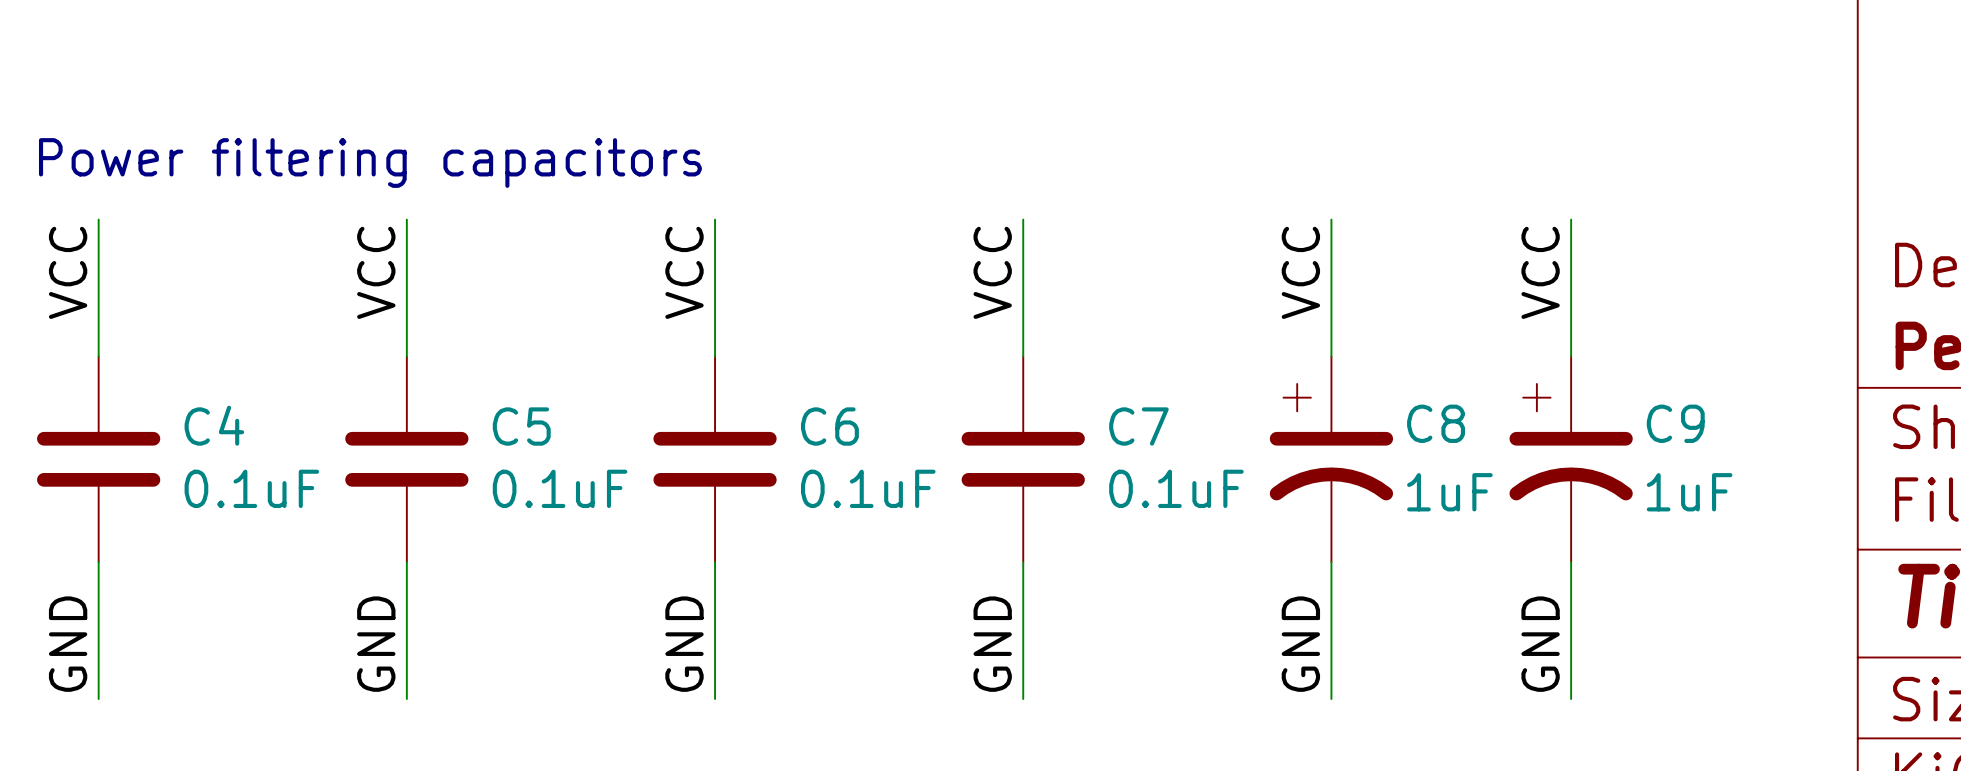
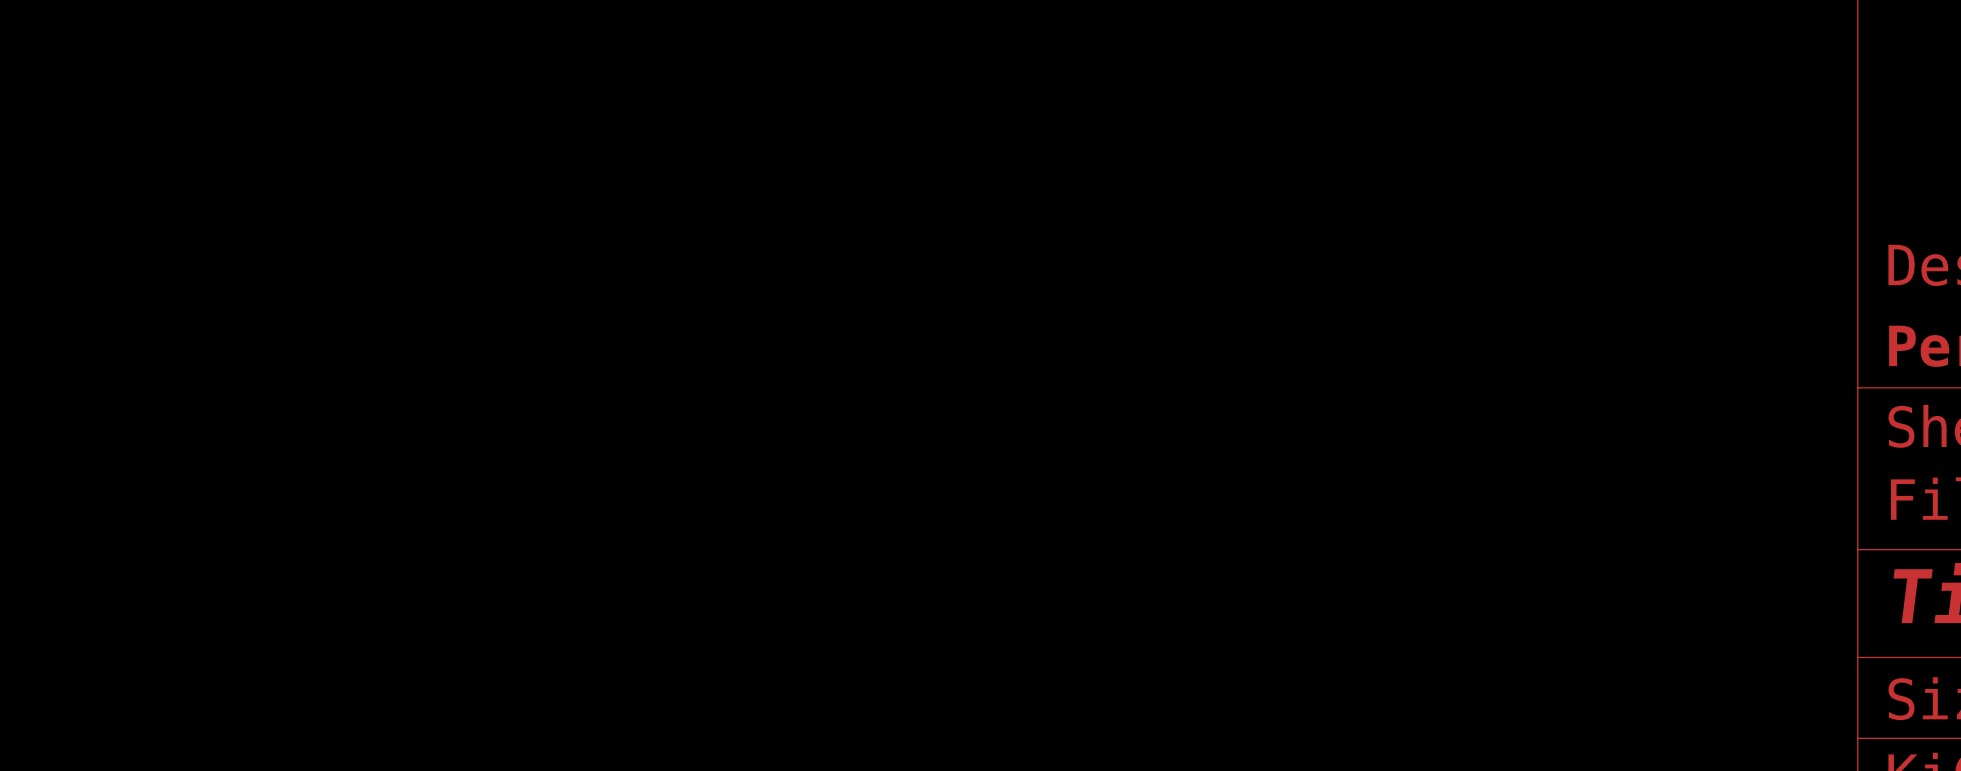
text: Power filtering capacitors (370, 163) -> none
wire: (98, 219) (98, 356) -> none
wire: (406, 219) (406, 356) -> none
wire: (715, 219) (715, 356) -> none
wire: (1023, 219) (1023, 356) -> none
wire: (1331, 219) (1331, 356) -> none
wire: (1571, 219) (1571, 356) -> none
label: VCC (68, 272) -> none
label: VCC (376, 272) -> none
label: VCC (684, 272) -> none
label: VCC (992, 272) -> none
label: VCC (1300, 272) -> none
label: VCC (1540, 272) -> none
C4: 0.1uF (98, 459) -> none
C5: 0.1uF (406, 459) -> none
C6: 0.1uF (715, 459) -> none
C7: 0.1uF (1023, 459) -> none
C8: 1uF (1331, 459) -> none
C9: 1uF (1571, 459) -> none
wire: (98, 562) (98, 699) -> none
wire: (406, 562) (406, 699) -> none
wire: (715, 562) (715, 699) -> none
wire: (1023, 562) (1023, 699) -> none
wire: (1331, 562) (1331, 699) -> none
wire: (1571, 562) (1571, 699) -> none
label: GND (68, 644) -> none
label: GND (376, 644) -> none
label: GND (684, 644) -> none
label: GND (992, 644) -> none
label: GND (1300, 644) -> none
label: GND (1540, 644) -> none

